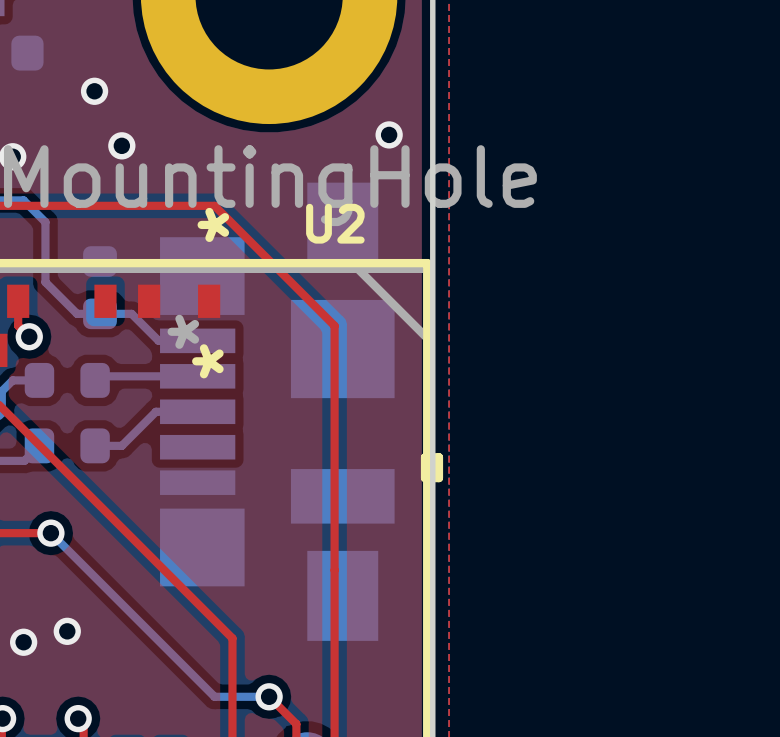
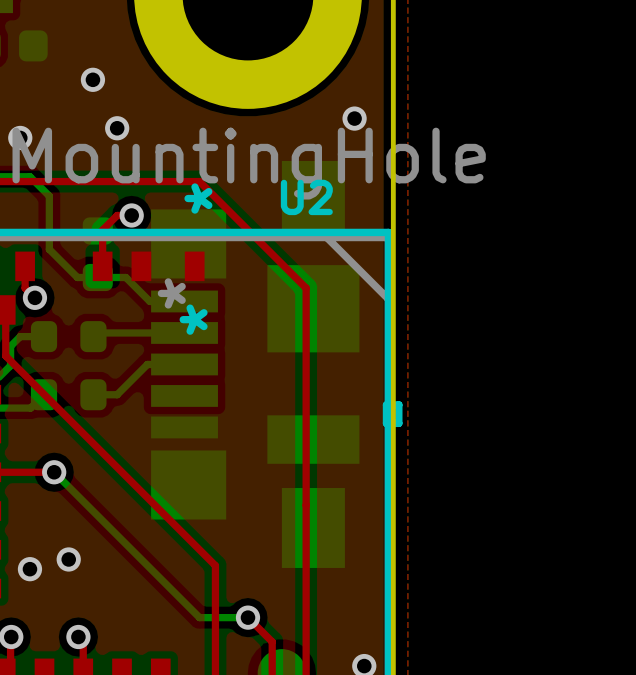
top track: none -> (131, 215) (117, 215) (102, 230) (102, 266)
via: none -> (131, 215)

